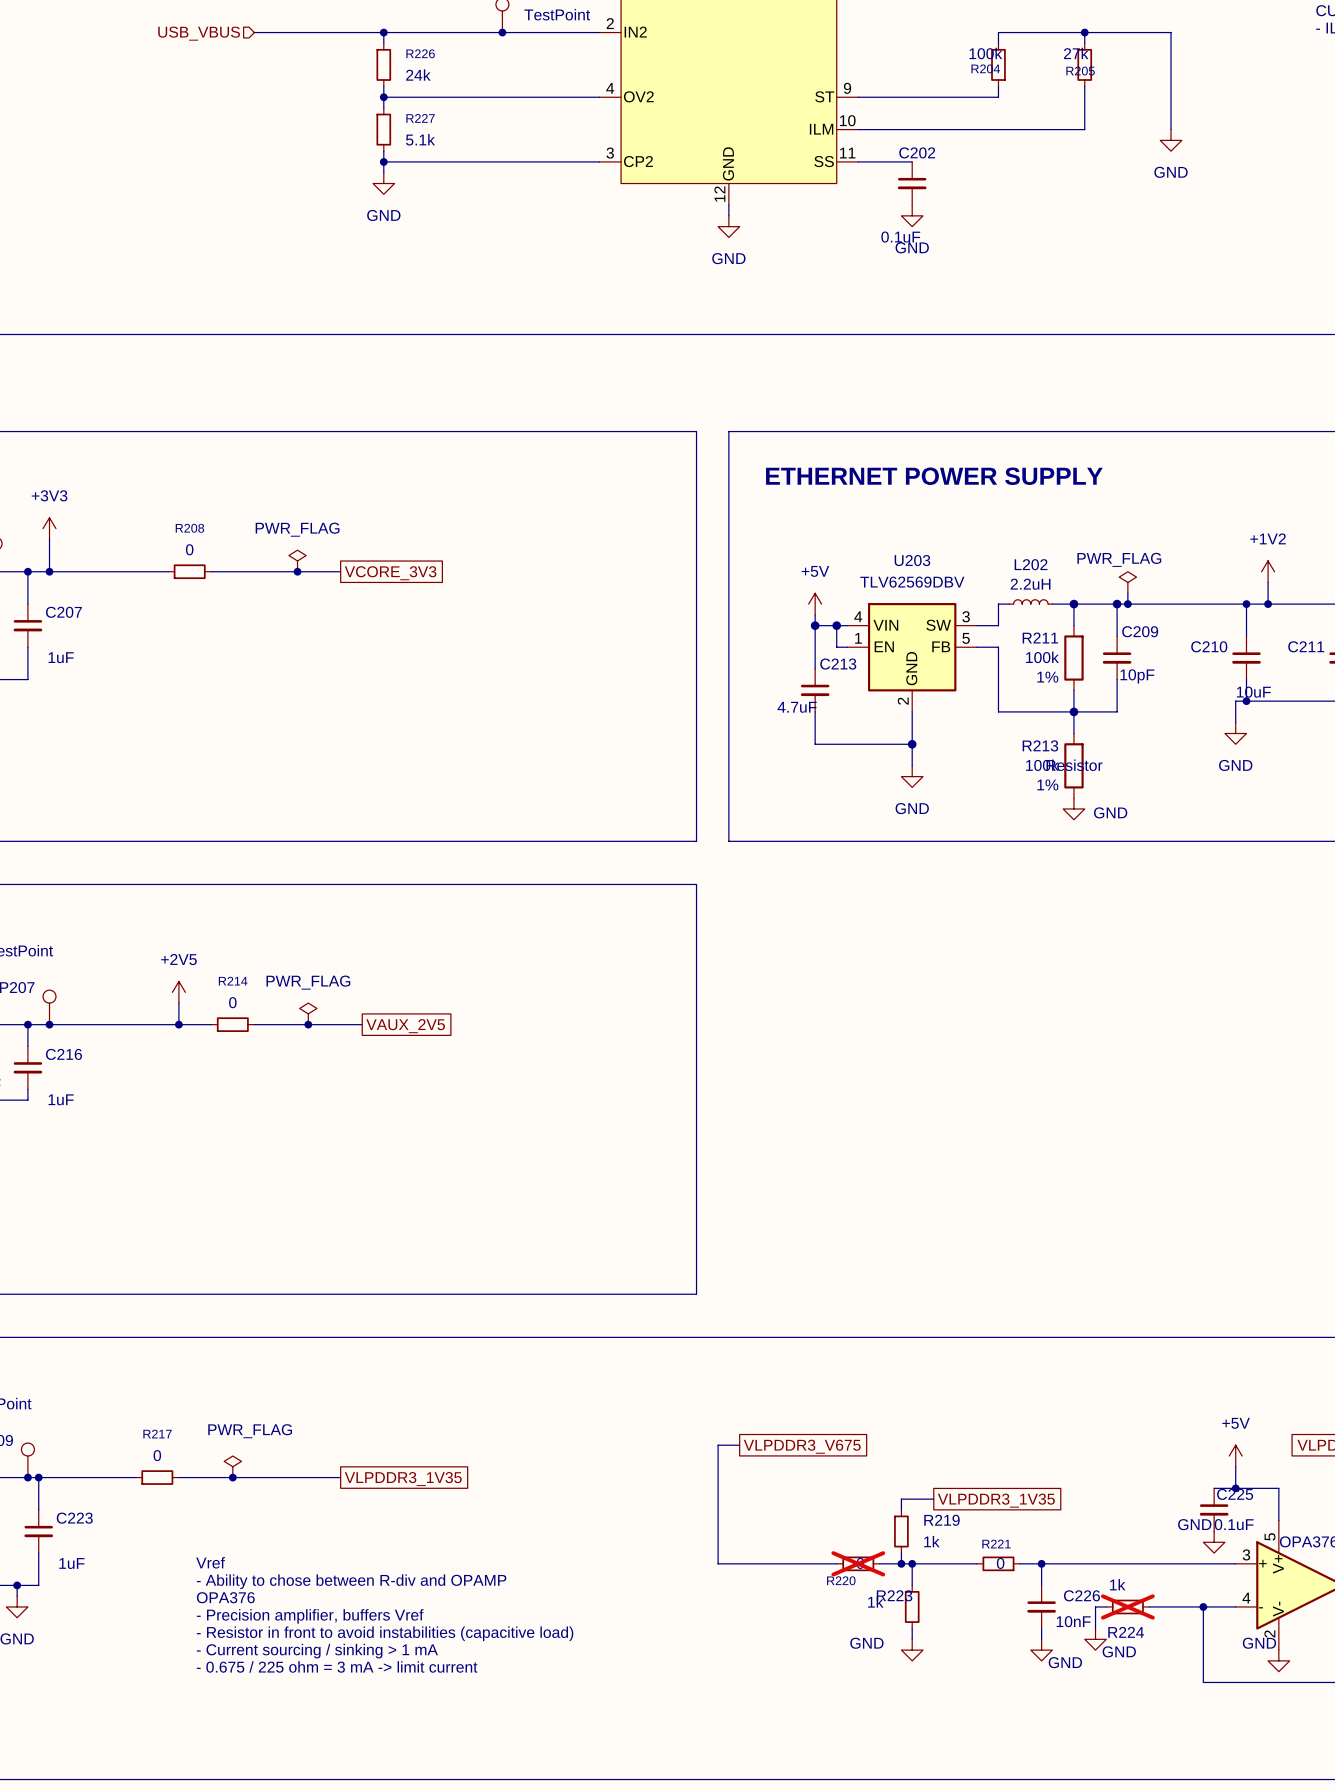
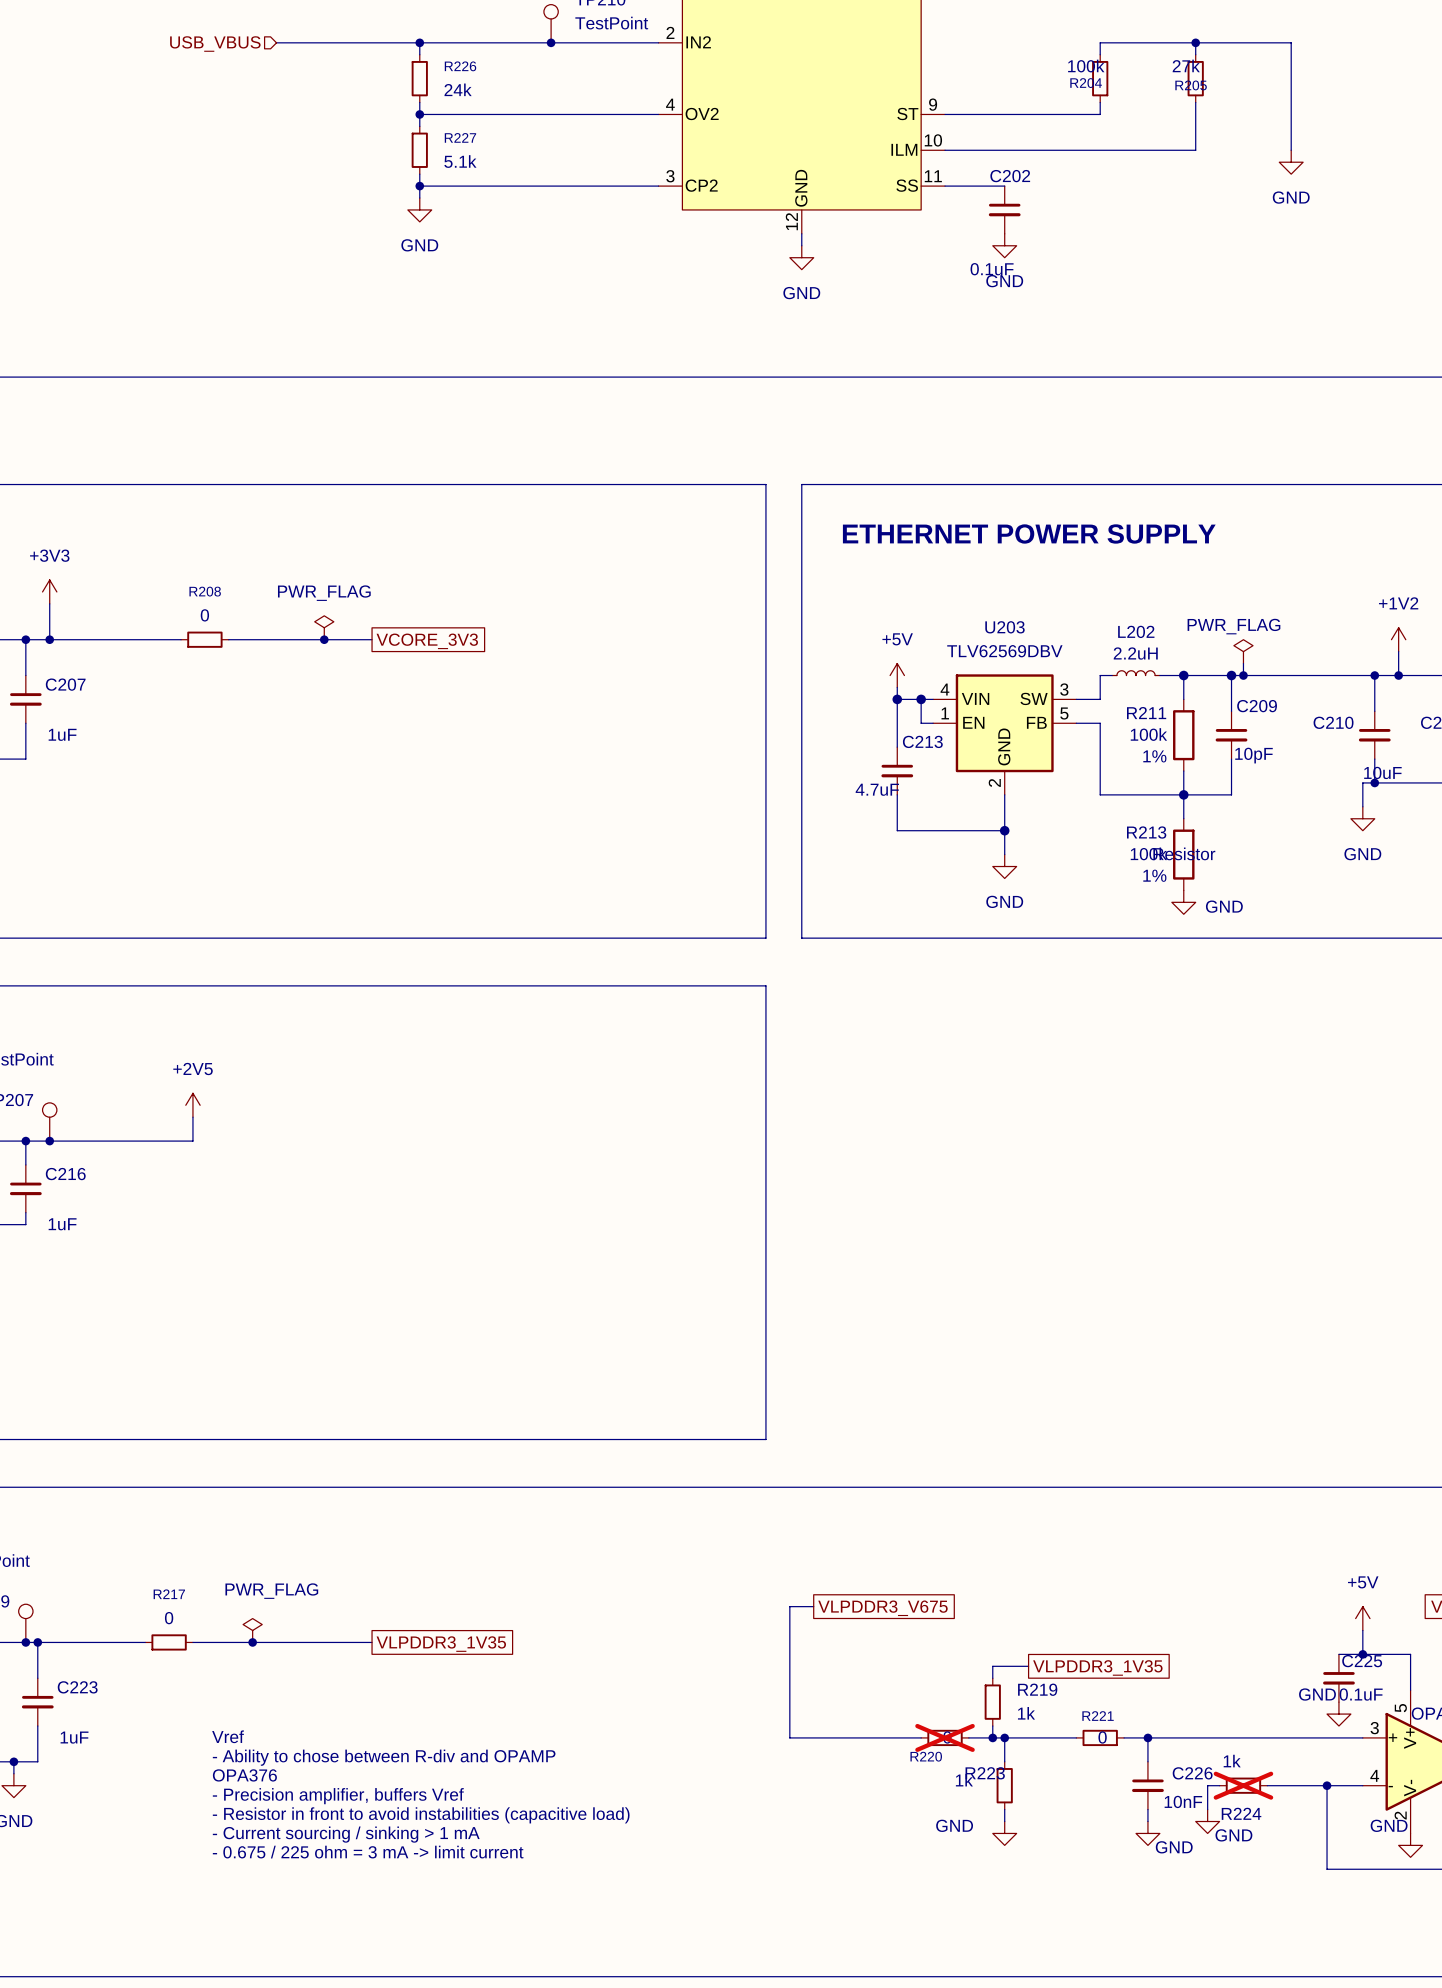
power symbol: PWR_FLAG (308, 1013) -> none
wire: (178, 1024) (211, 1024) -> none
junction: (178, 1024) -> none
R214: 0 (232, 1024) -> none
wire: (254, 1024) (362, 1024) -> none
junction: (308, 1024) -> none
global label: VAUX_2V5 (405, 1026) -> none

